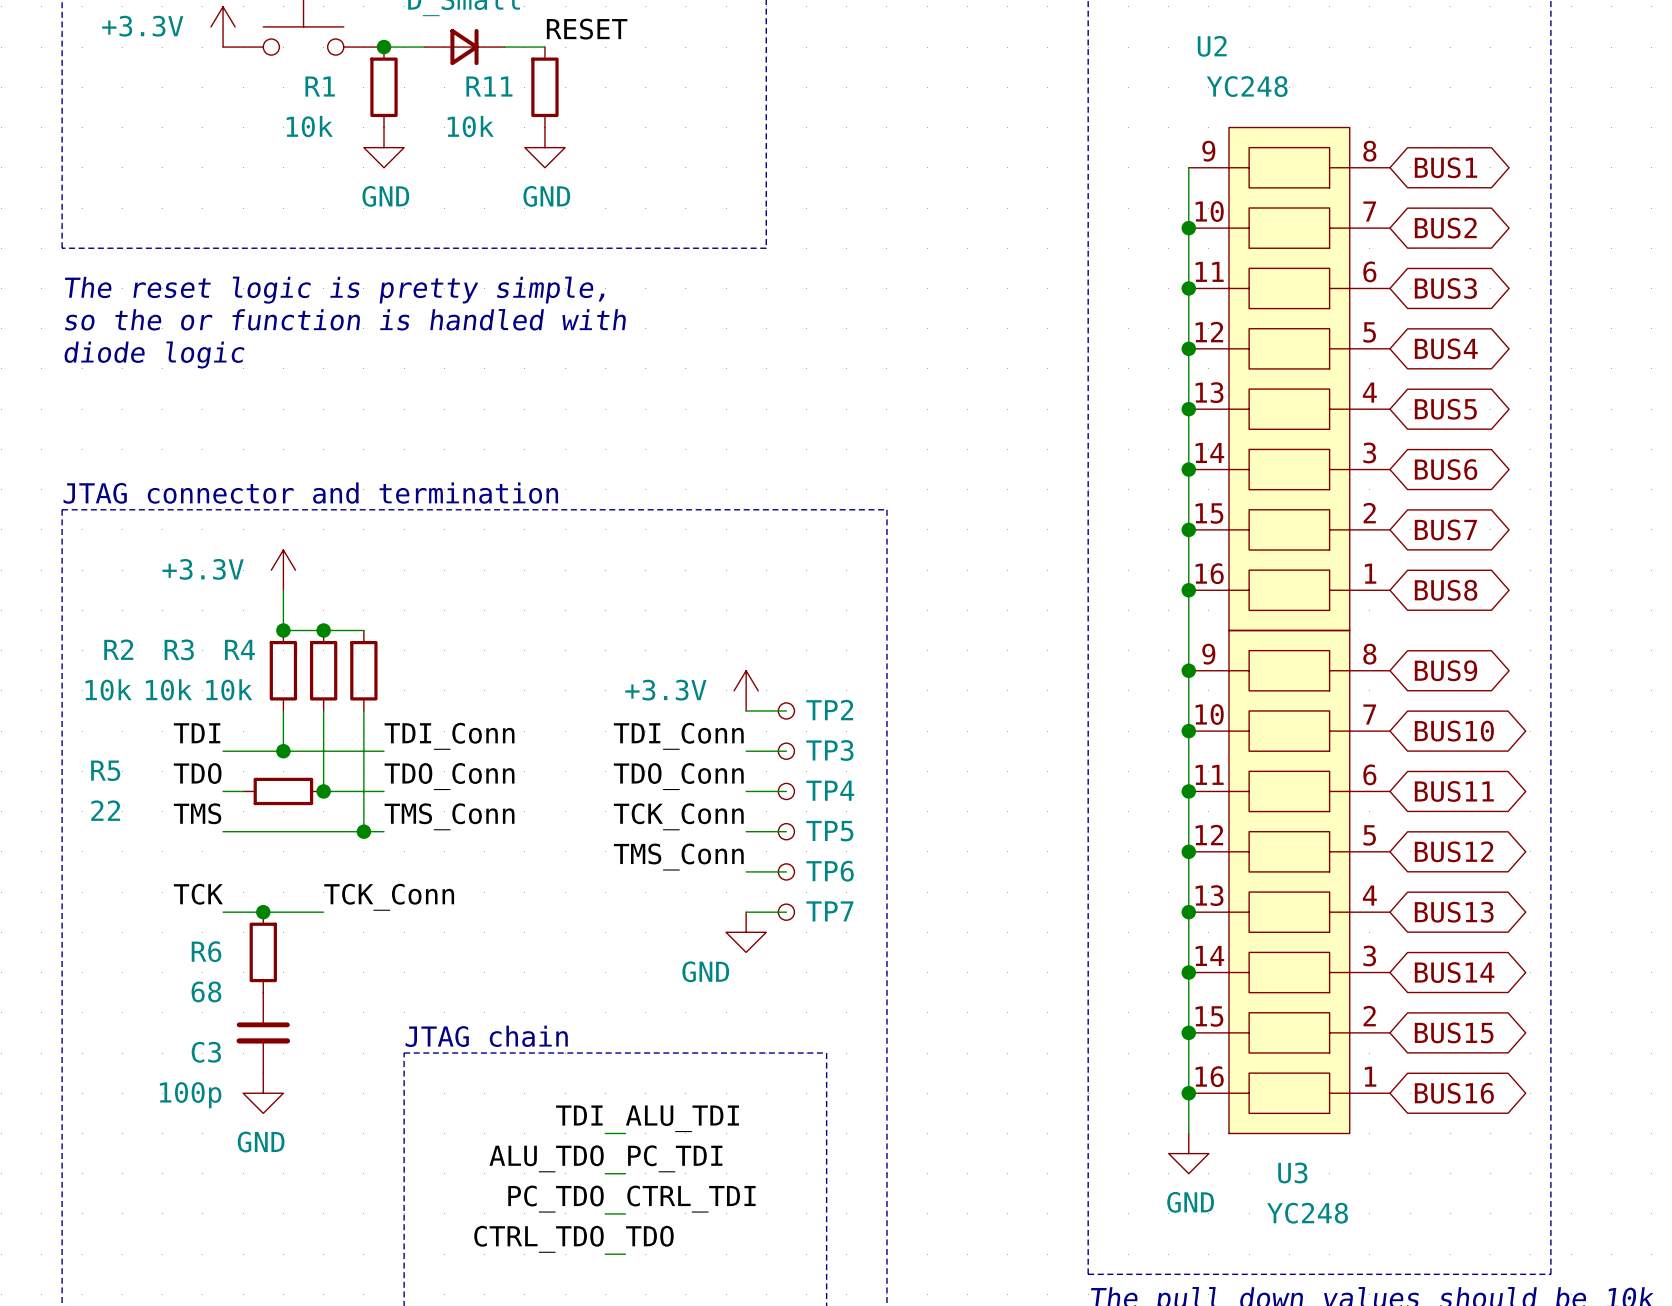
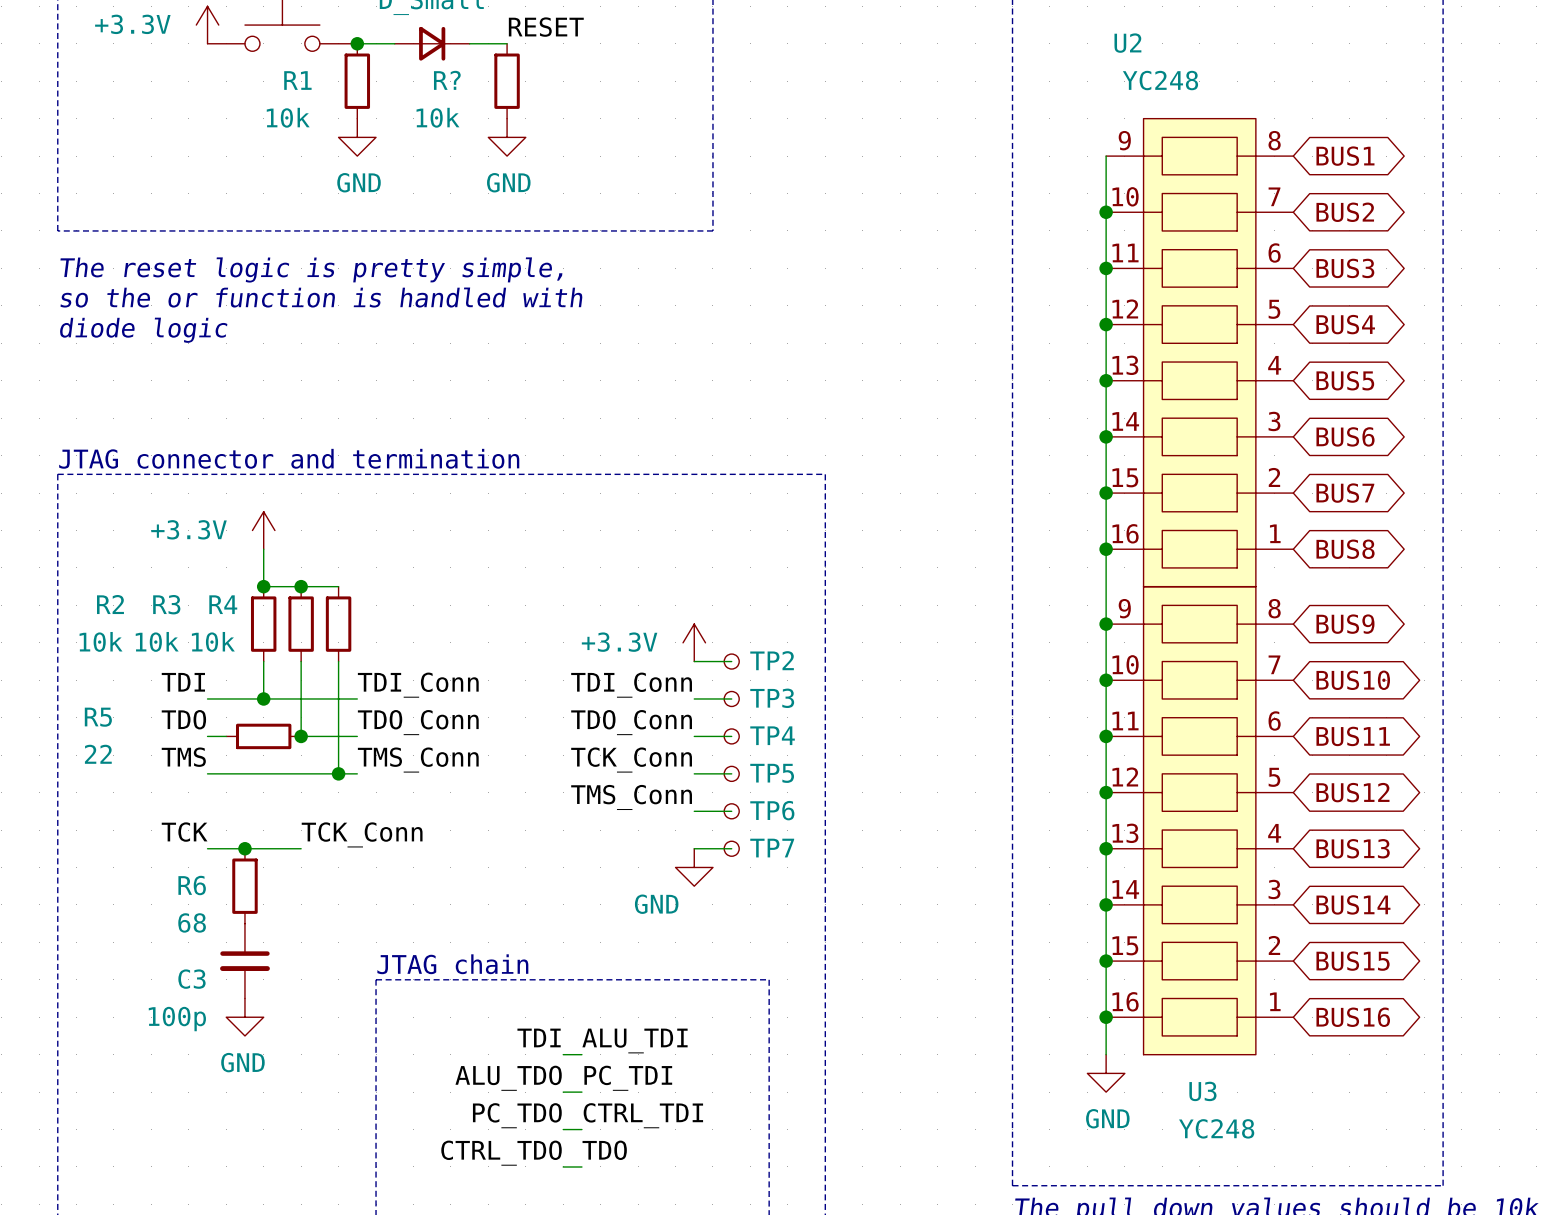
R11 name: R11 (489, 86) -> R? (447, 80)

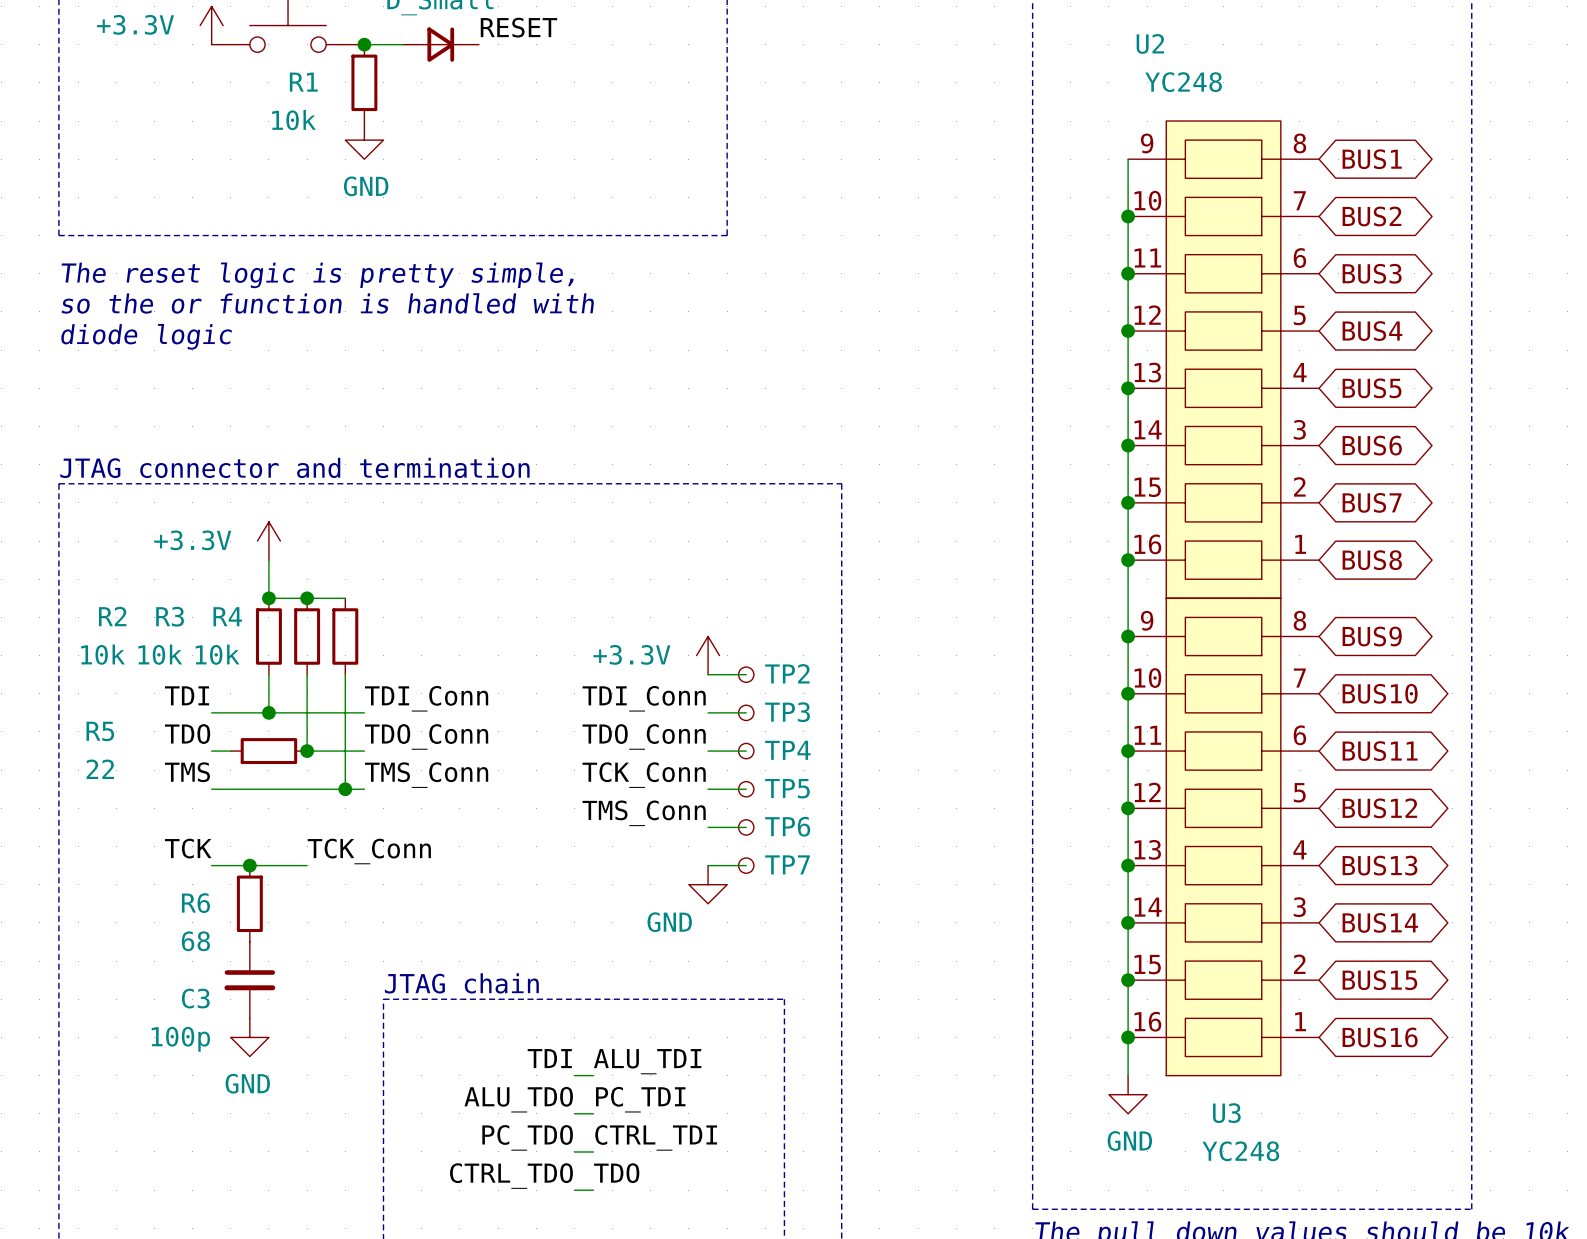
label position: RESET (546, 27) -> RESET (518, 27)
wire: (469, 43) (507, 43) -> none
R?: 10k (507, 81) -> none
power symbol: GND (507, 137) -> none

